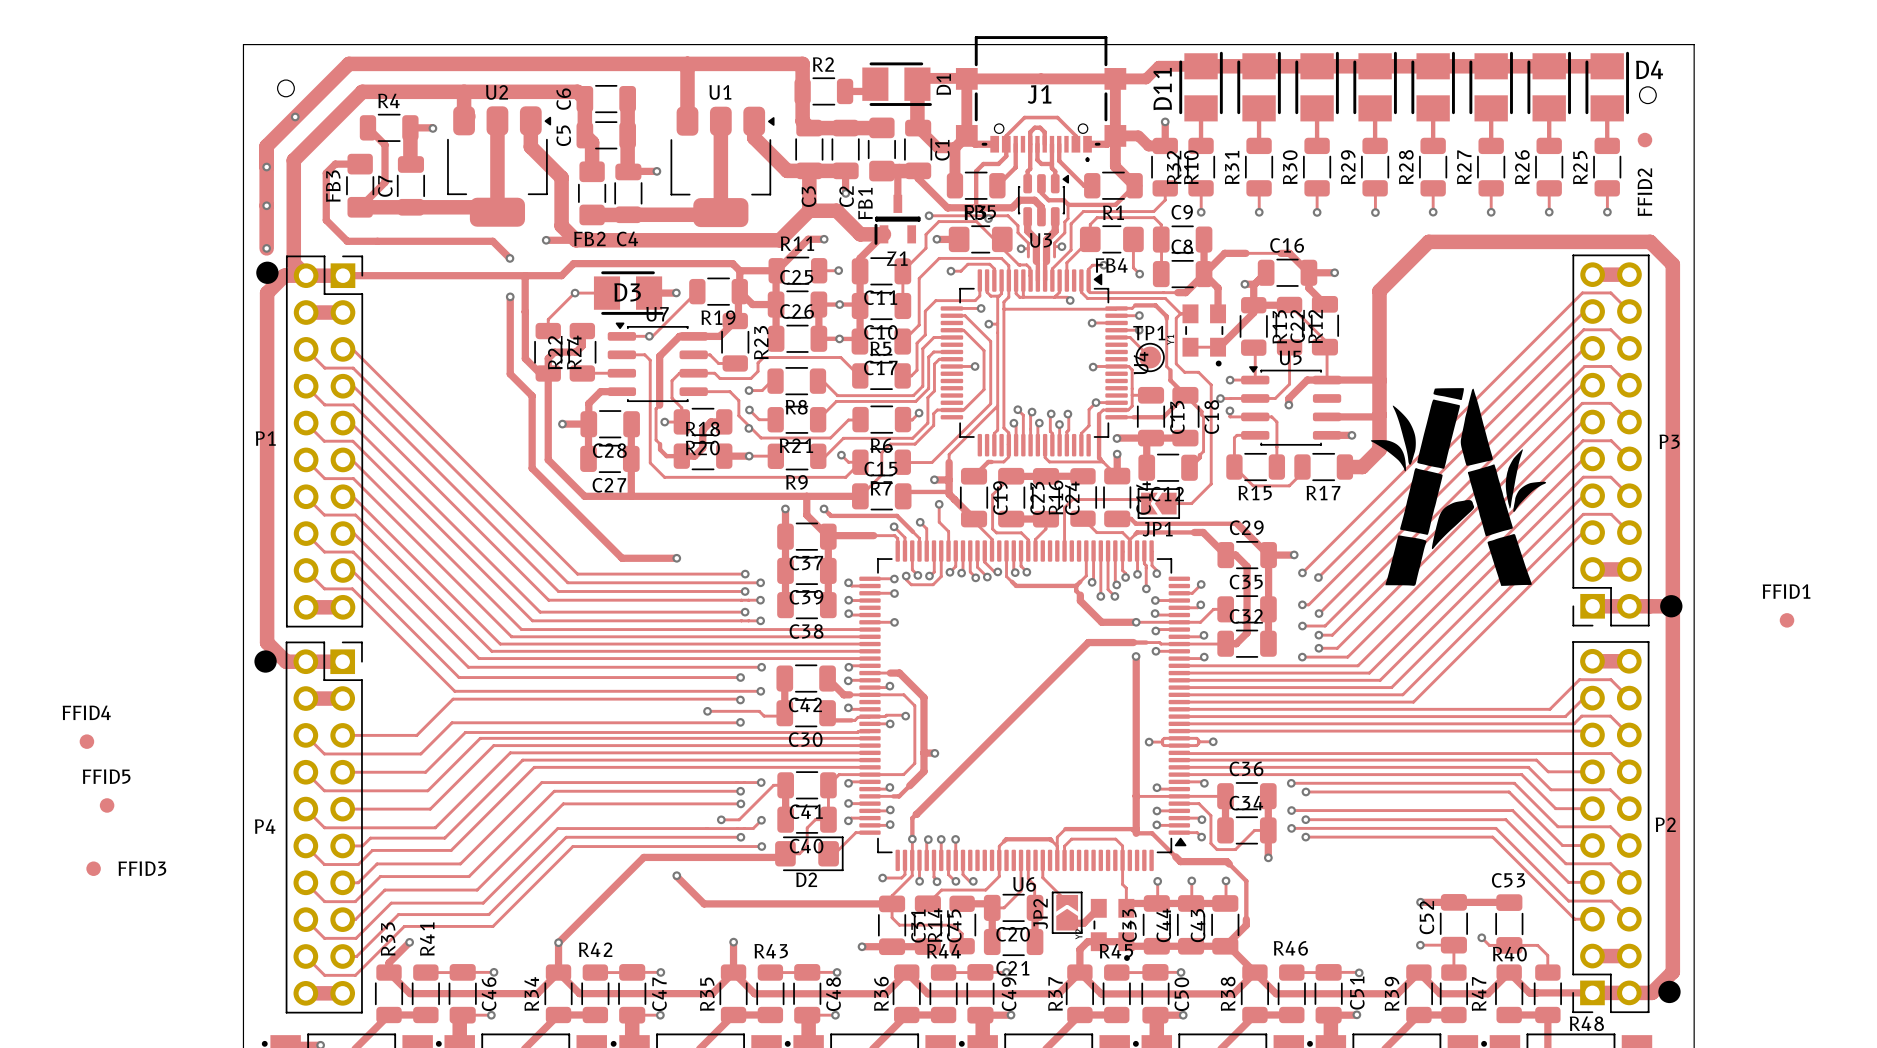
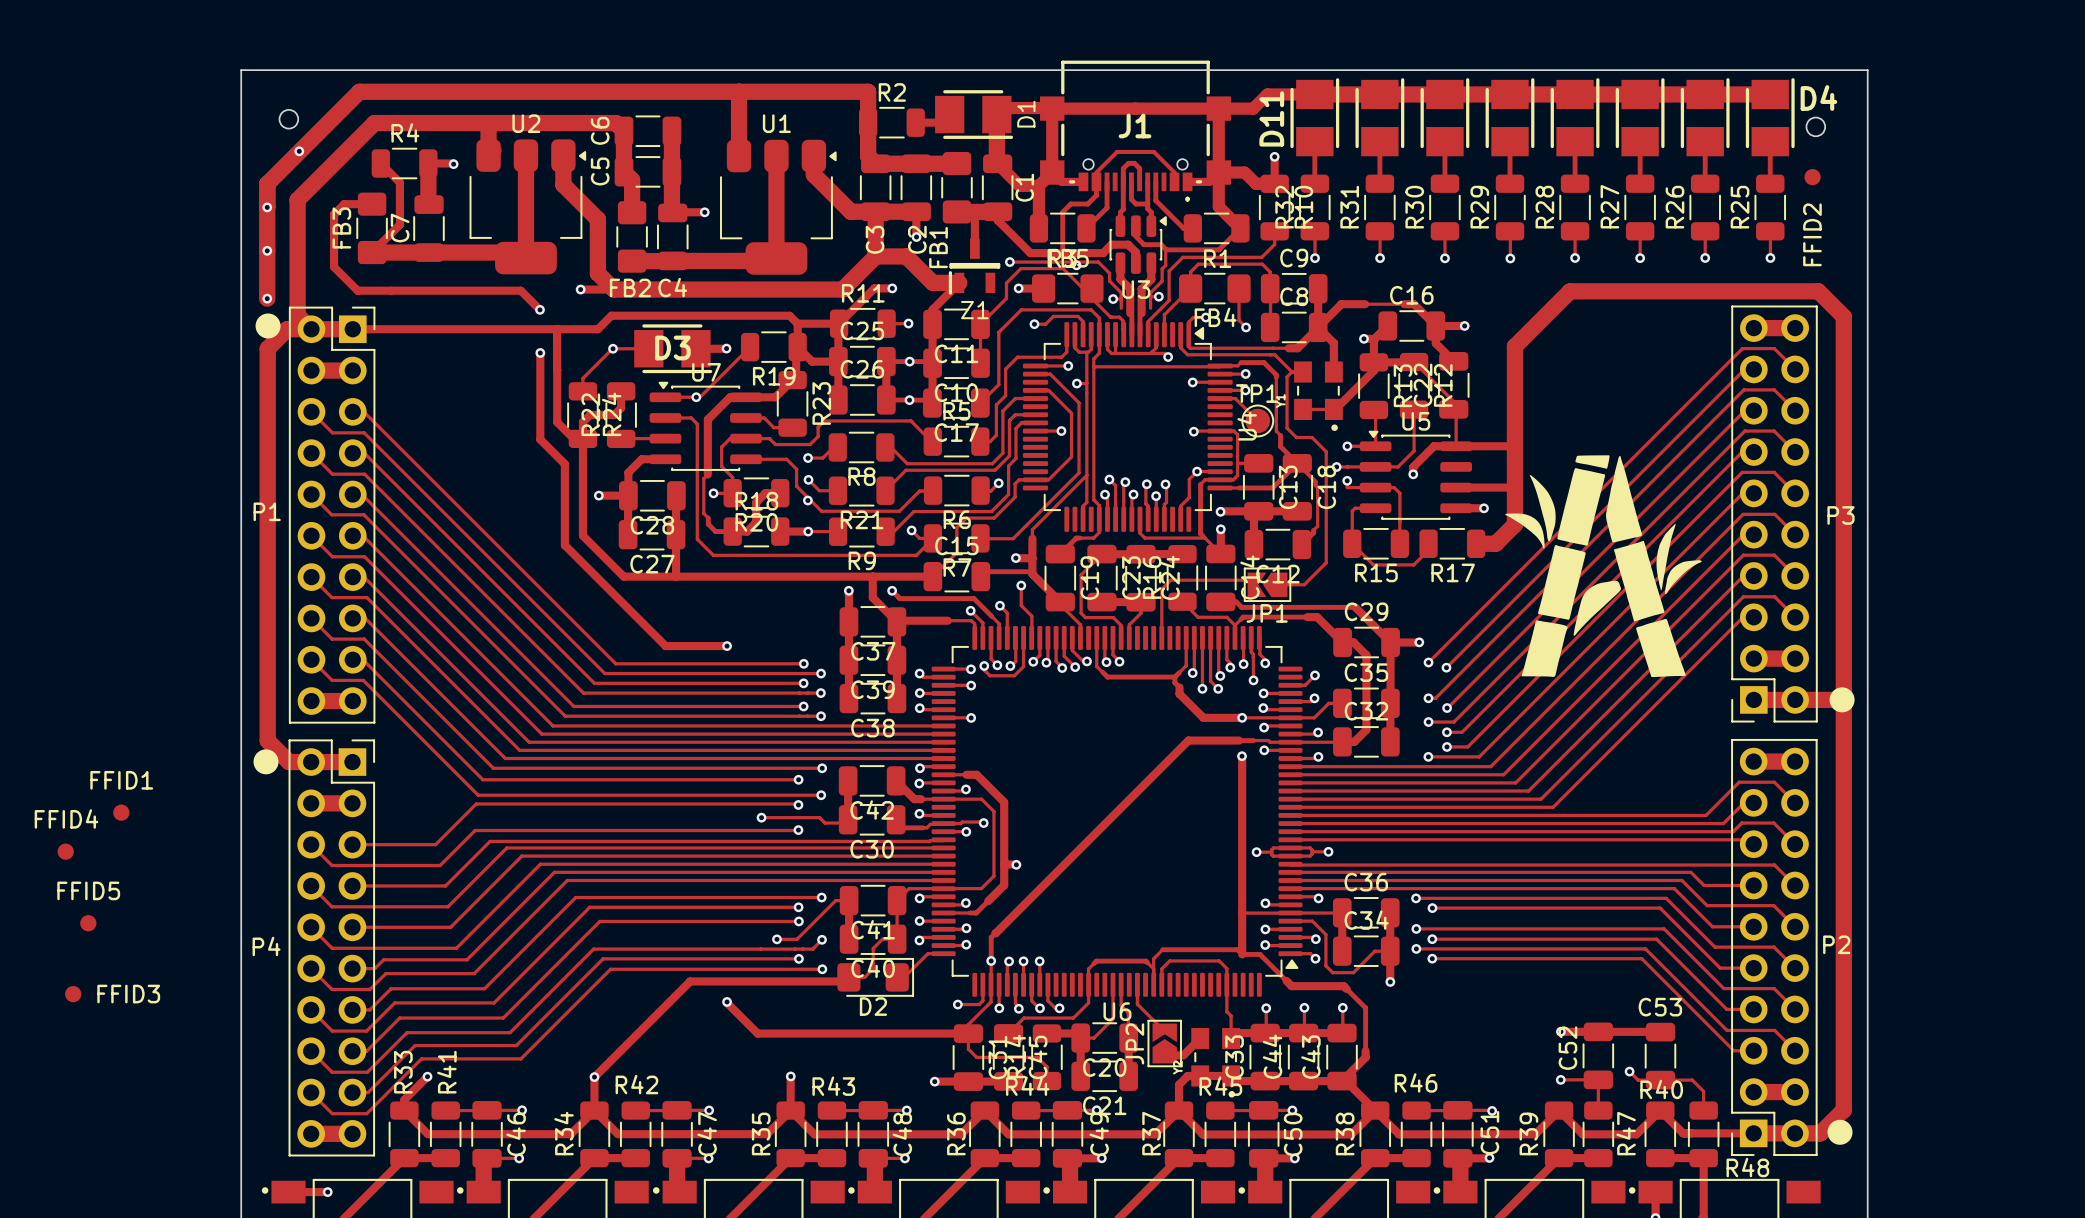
FFID1 position: (1787, 620) -> (121, 812)

